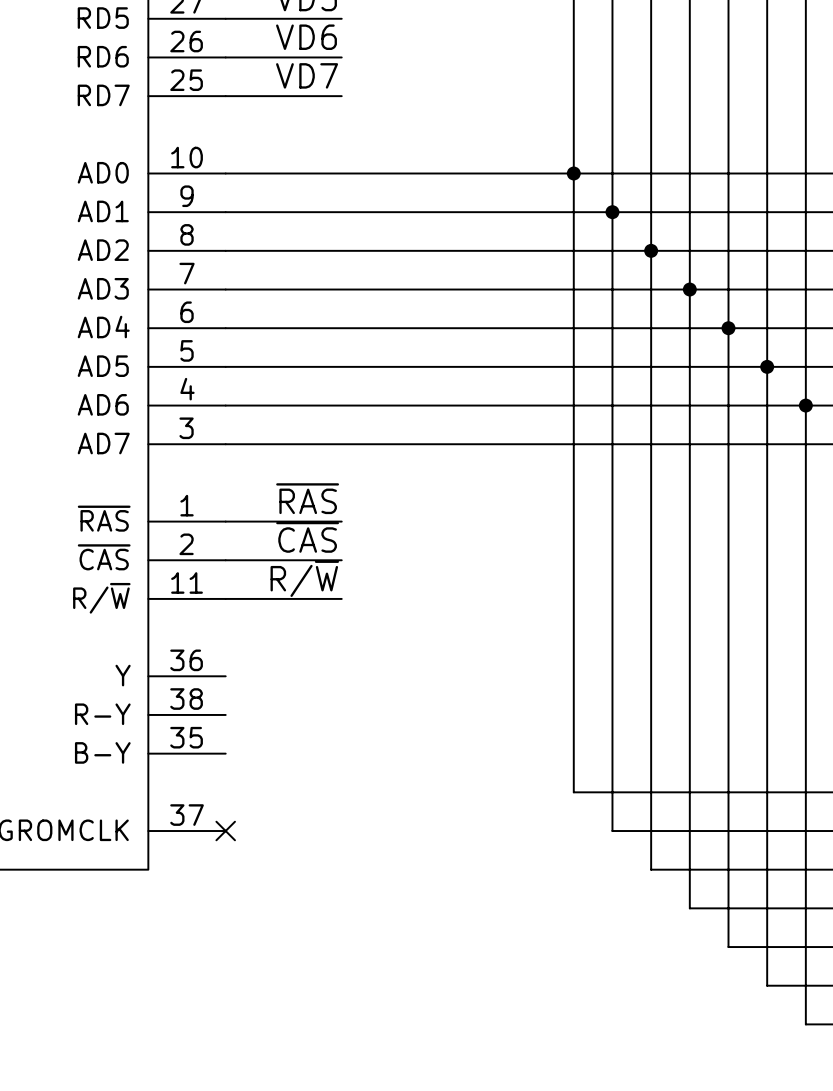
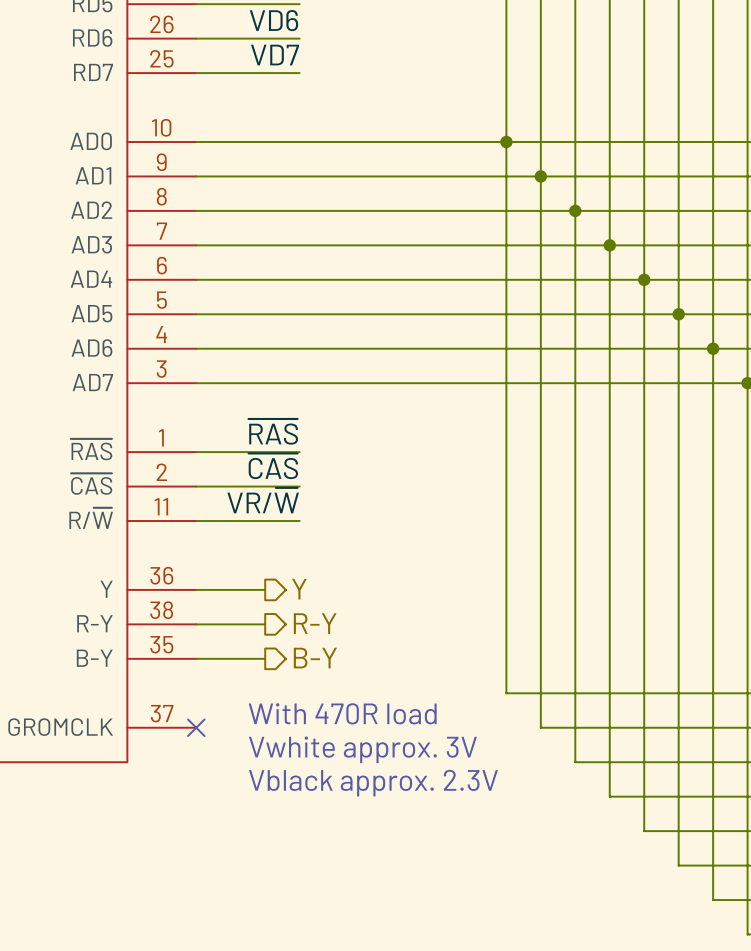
label: R/~{W} (304, 578) -> VR/~{W} (263, 500)
hierarchical label: none -> Y (299, 589)
wire: none -> (196, 589) (265, 589)
wire: none -> (196, 624) (265, 624)
hierarchical label: none -> R-Y (315, 623)
hierarchical label: none -> B-Y (315, 658)
wire: none -> (196, 658) (265, 658)
text: none -> With 470R load (342, 713)
text: none -> Vwhite approx. 3V (362, 749)
text: none -> Vblack approx. 2.3V (373, 783)

